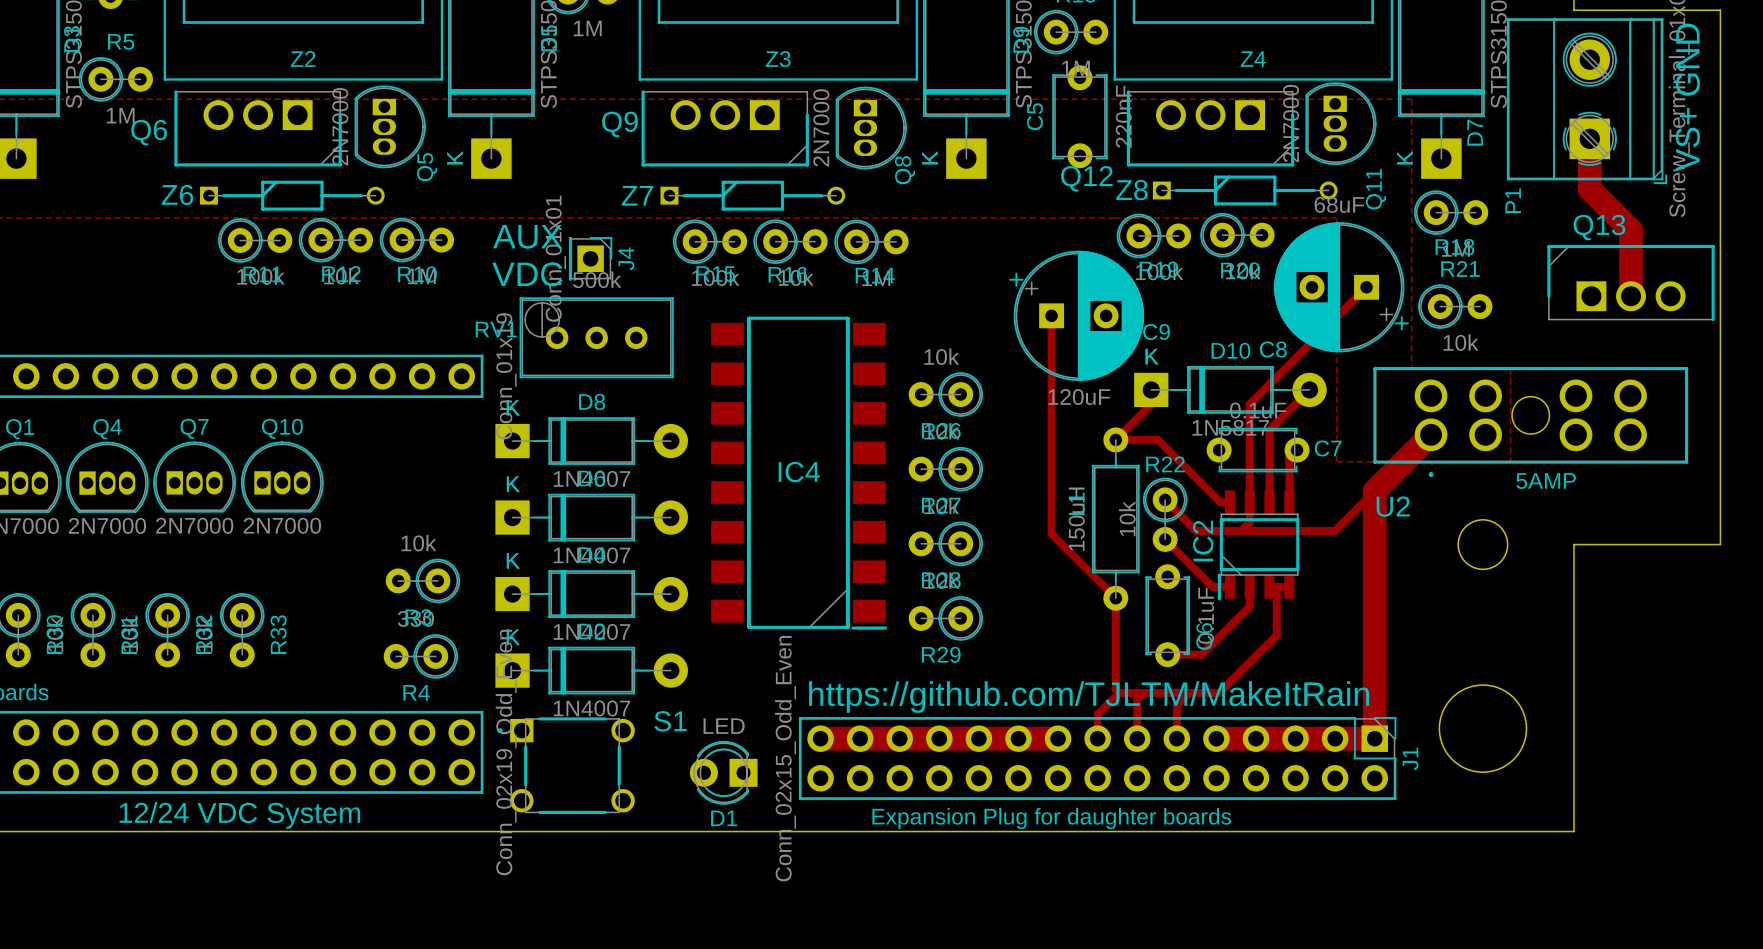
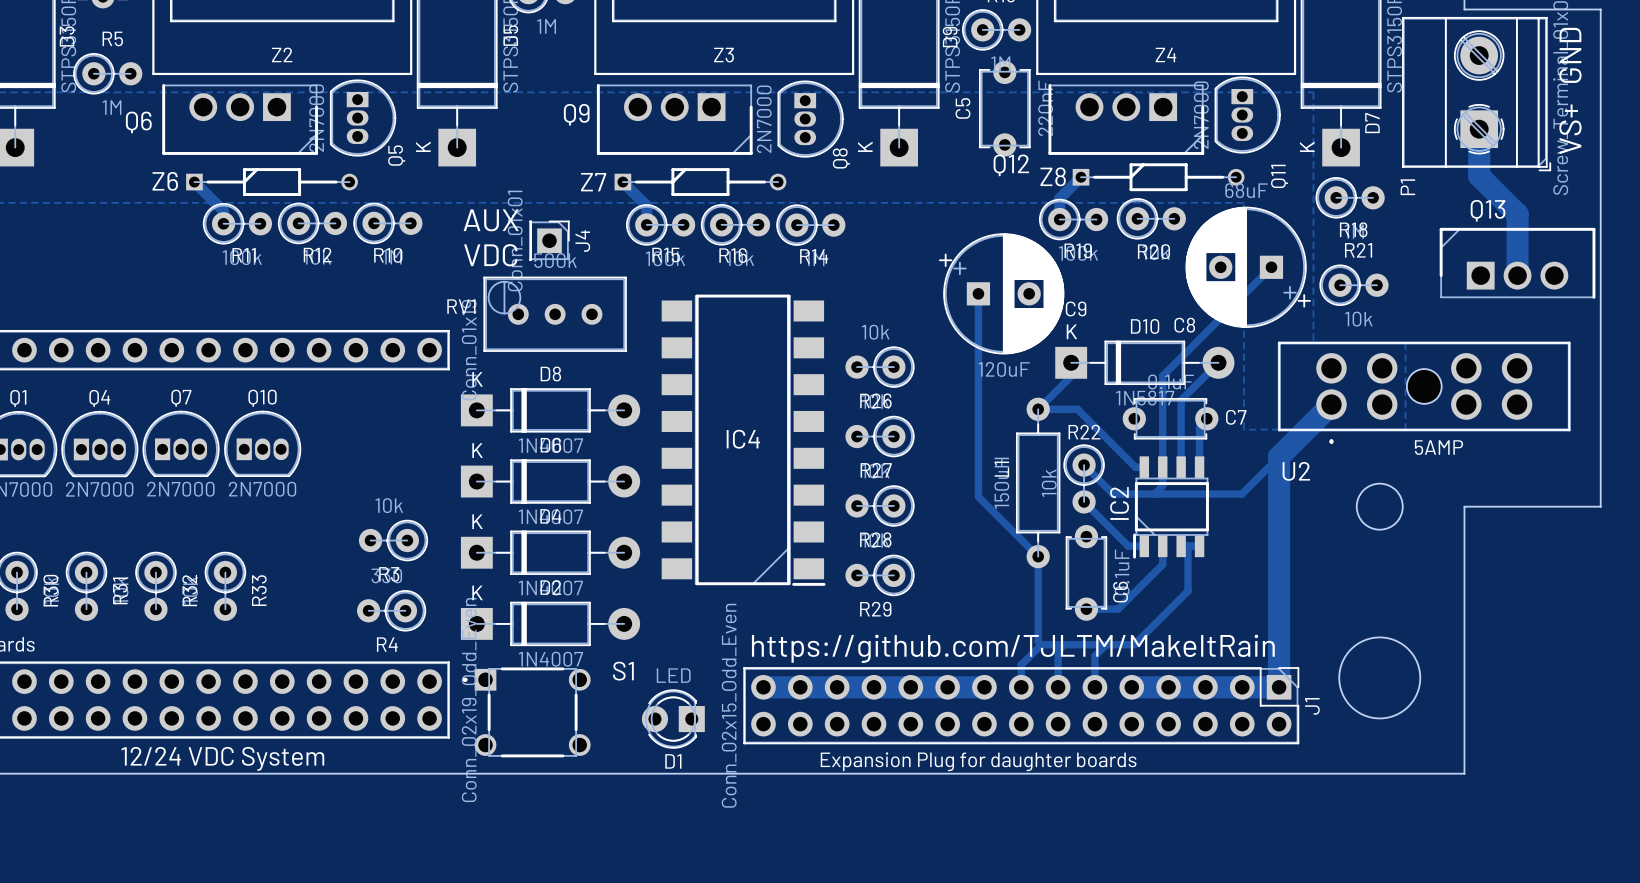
track: none -> (1081, 177) (1059, 198) (1059, 219)
track: none -> (194, 182) (223, 211) (223, 223)
track: none -> (622, 182) (646, 205) (646, 224)

